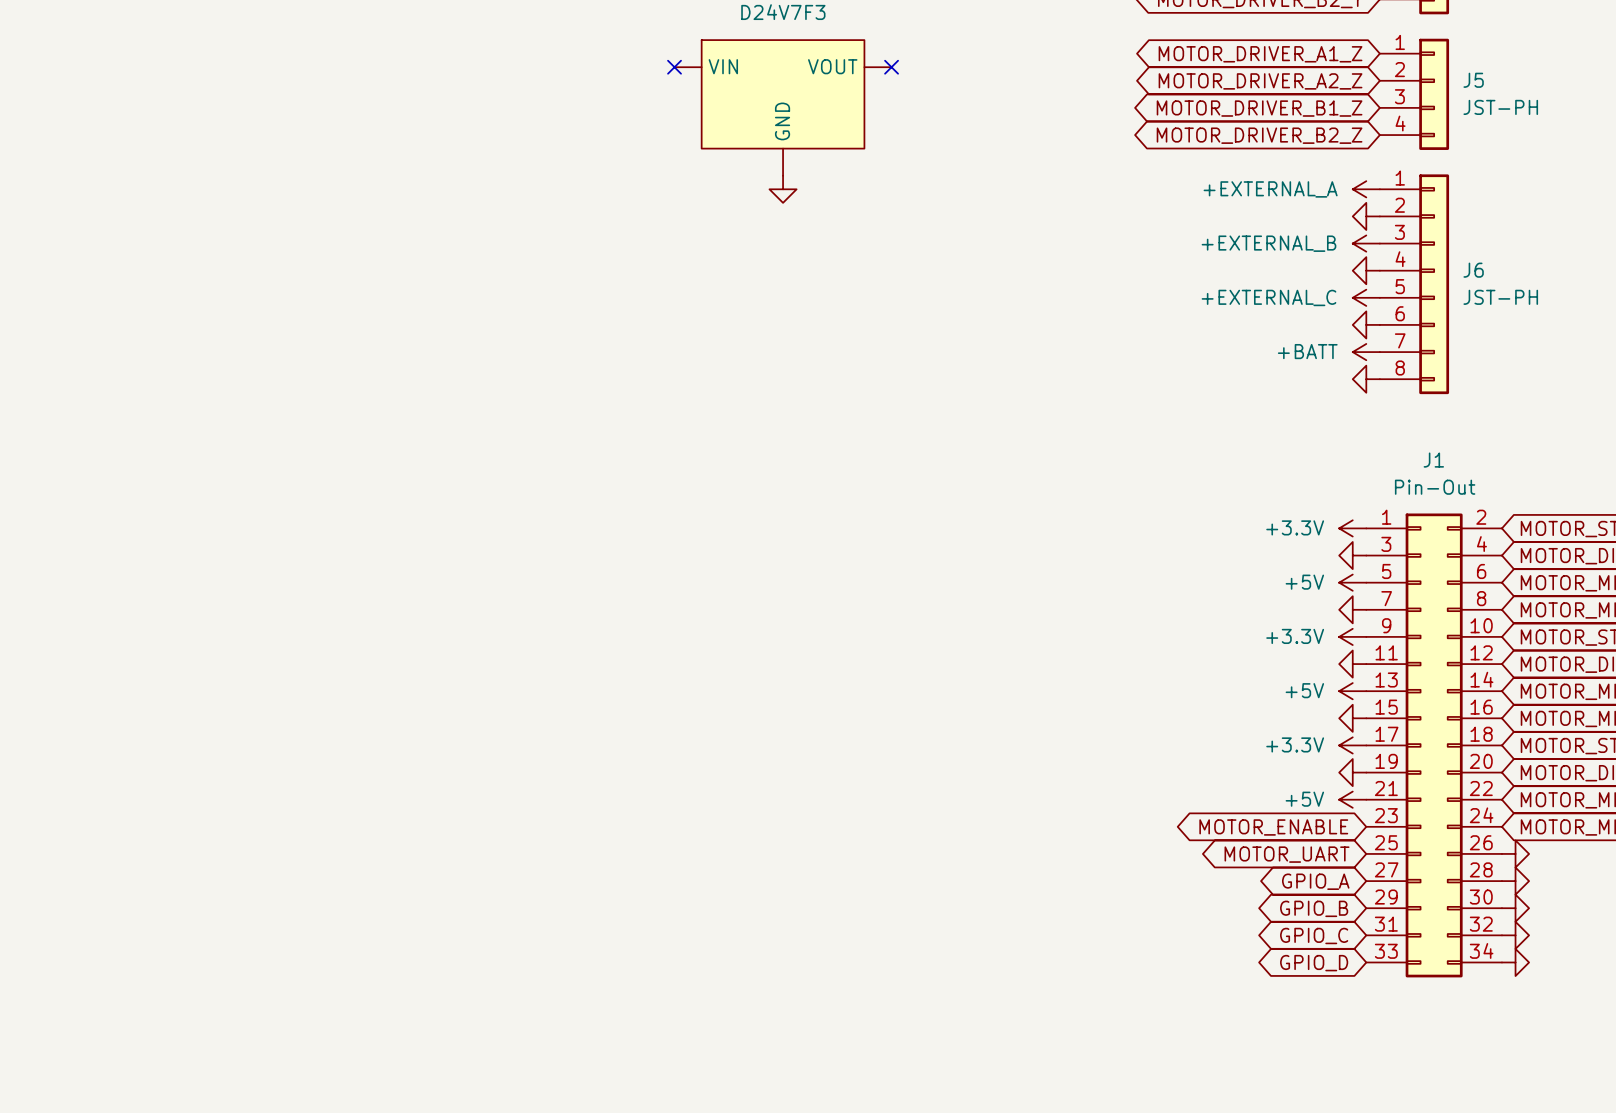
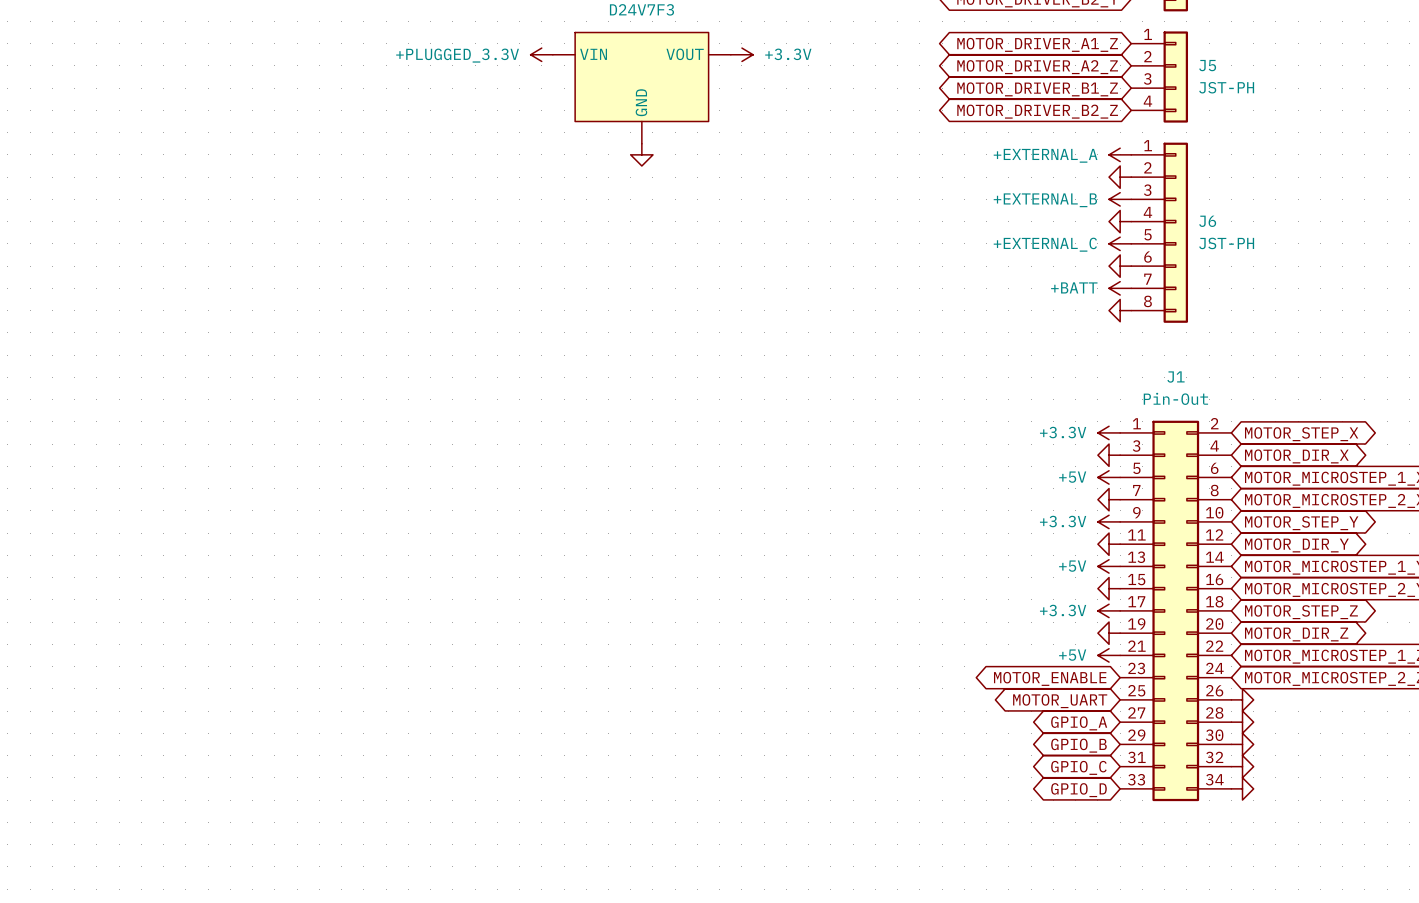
power symbol: none -> +PLUGGED_3.3V (541, 54)
no-connect mark: (674, 67) -> none
no-connect mark: (891, 67) -> none
power symbol: none -> +3.3V (741, 54)

